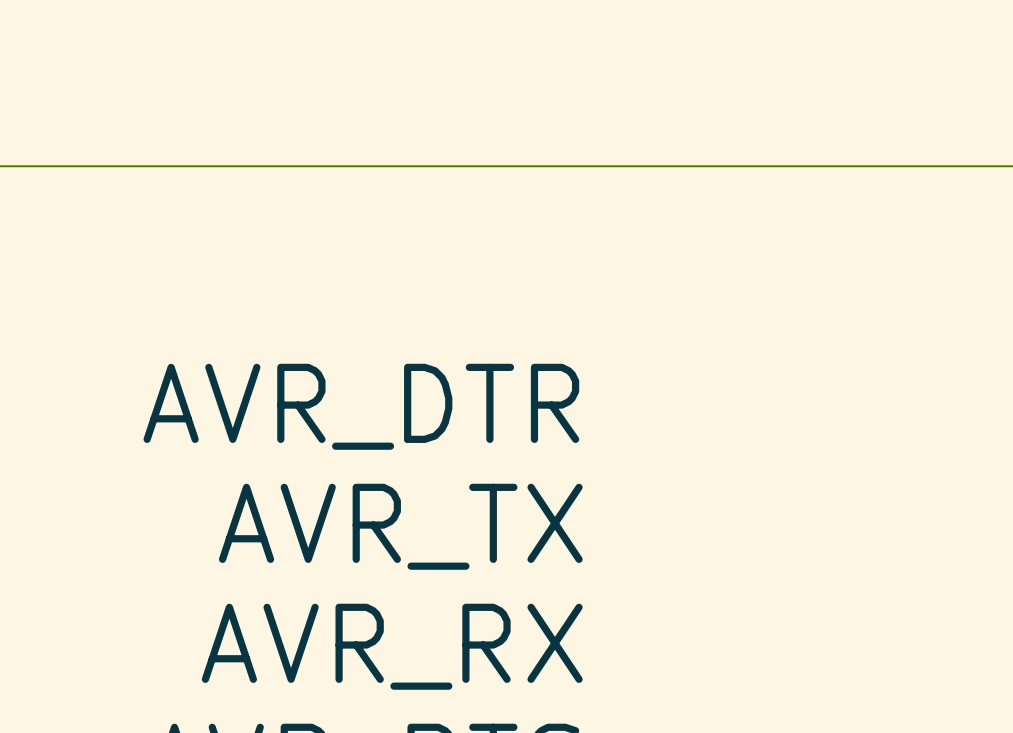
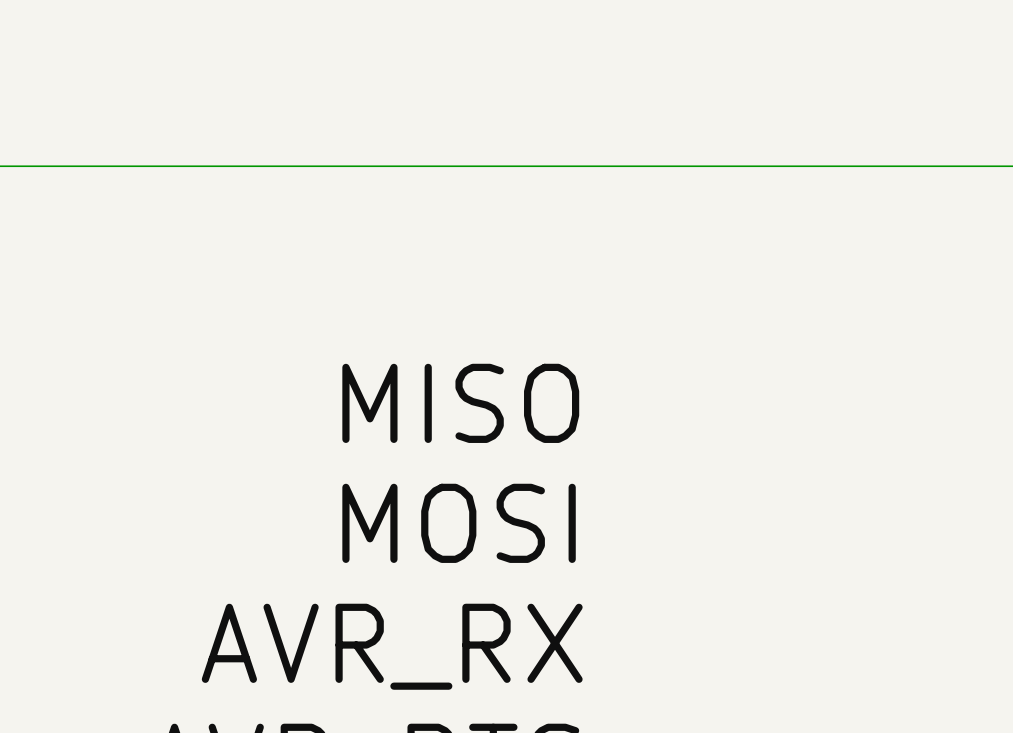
label: AVR_DTR (361, 406) -> MISO (460, 403)
label: AVR_TX (400, 526) -> MOSI (459, 523)

